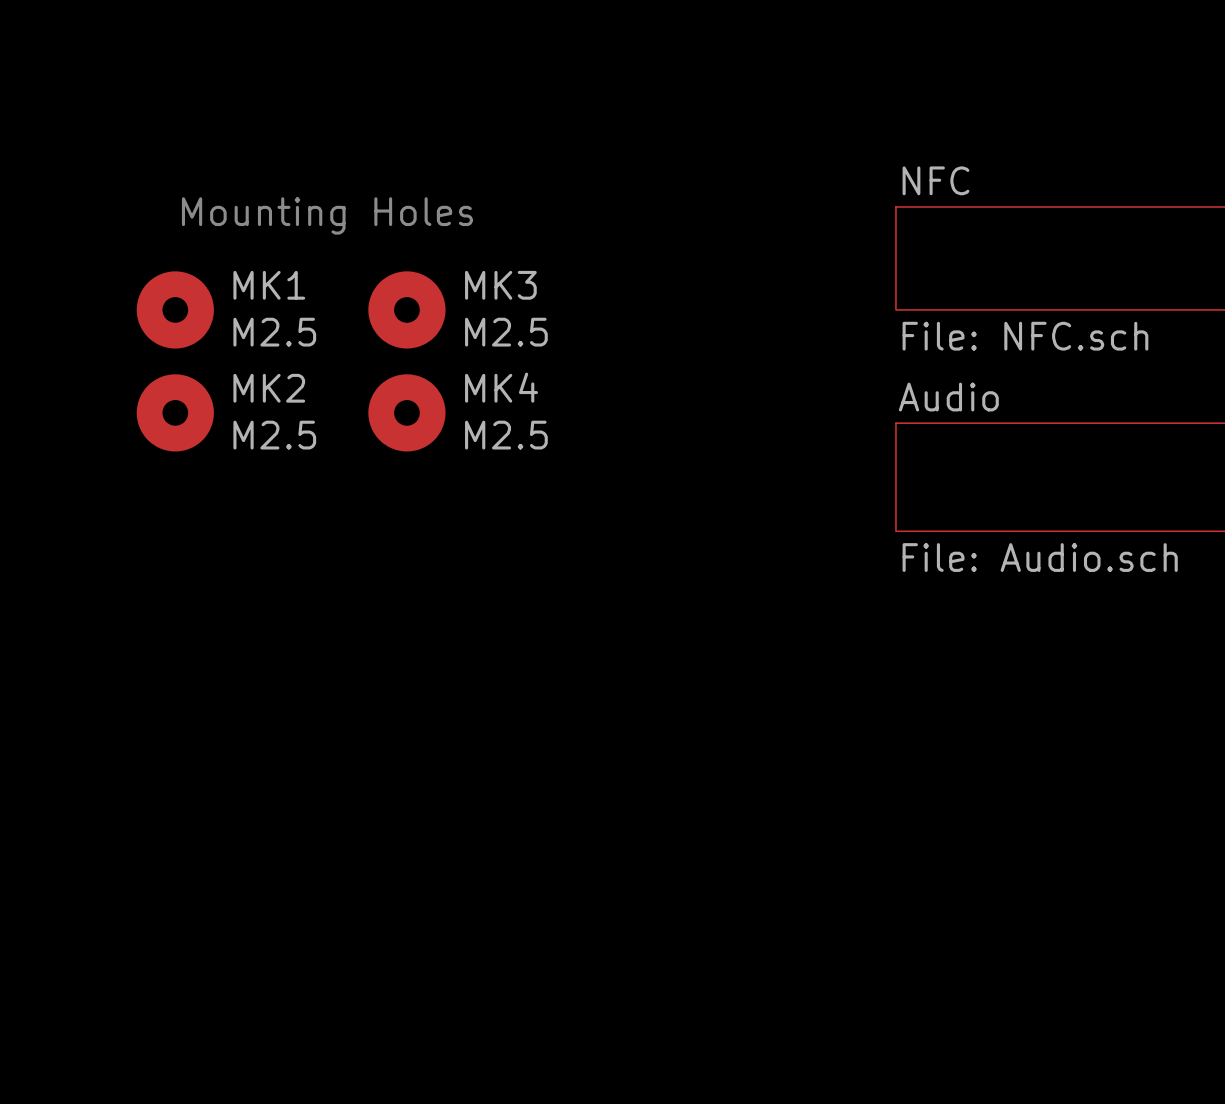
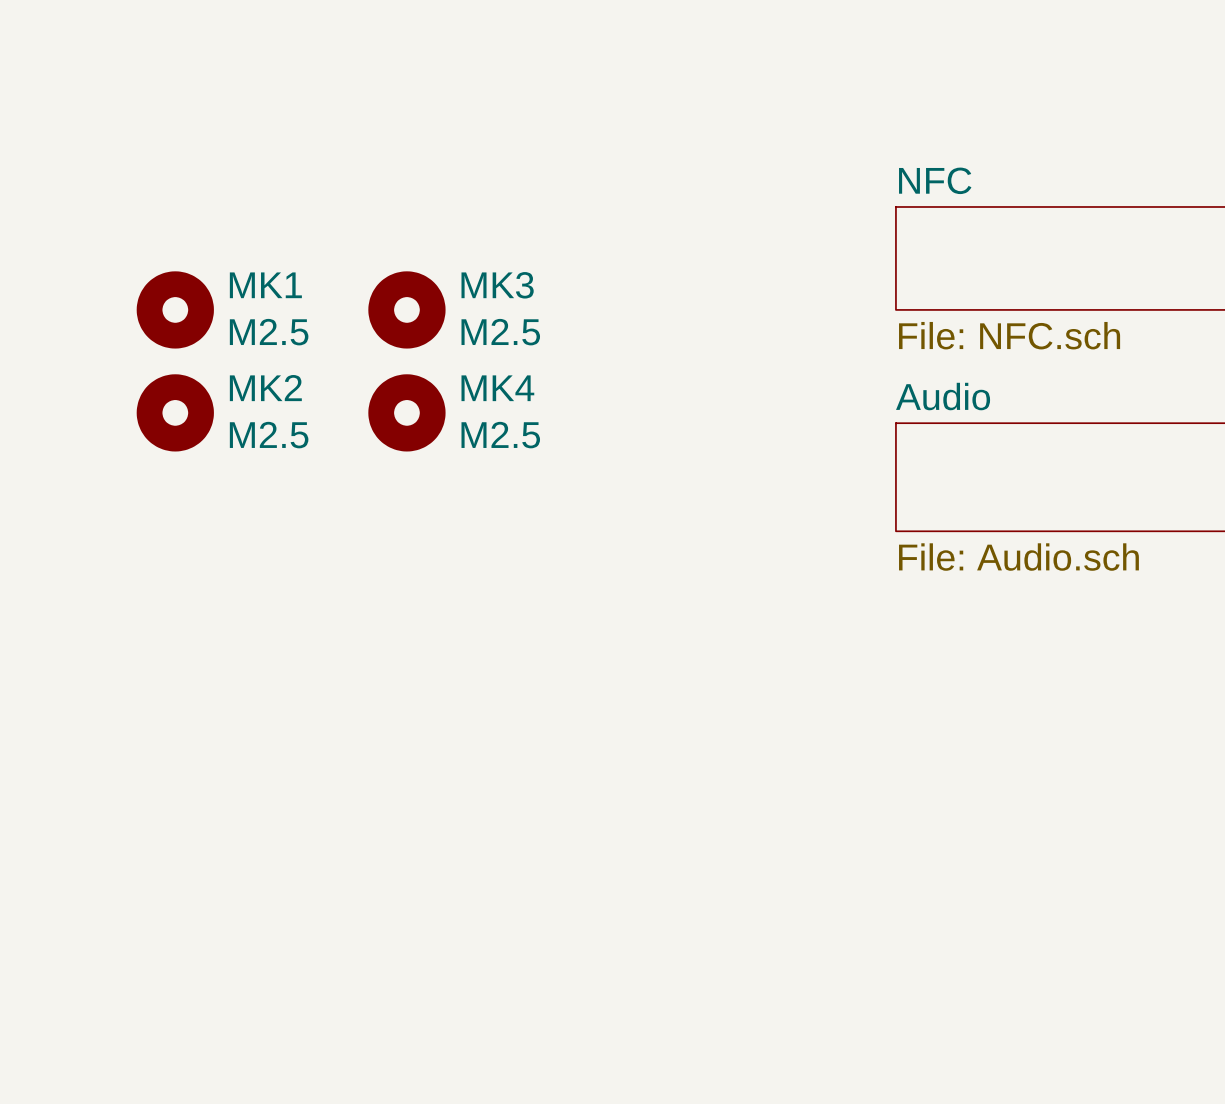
text: Mounting Holes (327, 215) -> none

